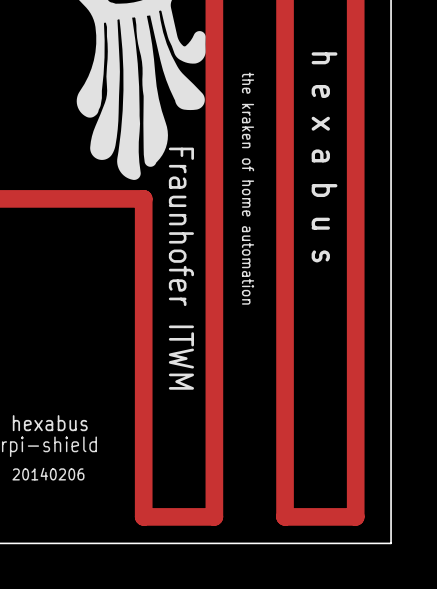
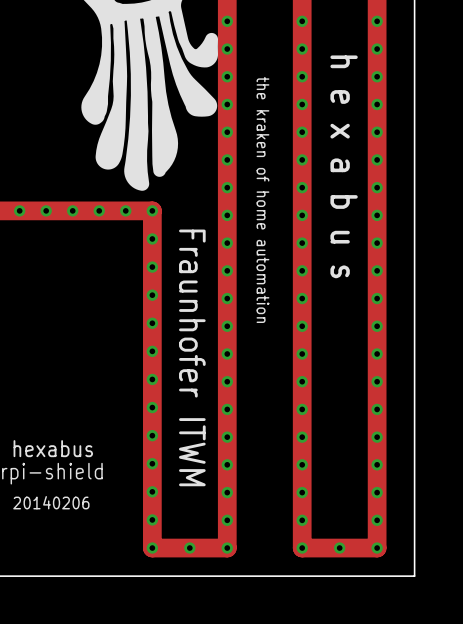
via: none -> (227, 21)
via: none -> (302, 21)
via: none -> (377, 21)
via: none -> (227, 49)
via: none -> (302, 49)
via: none -> (377, 49)
via: none -> (227, 76)
via: none -> (302, 76)
via: none -> (377, 76)
via: none -> (227, 104)
via: none -> (302, 104)
via: none -> (377, 104)
via: none -> (227, 132)
via: none -> (302, 132)
via: none -> (377, 132)
via: none -> (227, 159)
via: none -> (302, 159)
via: none -> (377, 159)
via: none -> (227, 187)
via: none -> (302, 187)
via: none -> (377, 187)
via: none -> (19, 210)
via: none -> (46, 210)
via: none -> (72, 210)
via: none -> (99, 210)
via: none -> (125, 210)
via: none -> (152, 210)
via: none -> (227, 215)
via: none -> (302, 215)
via: none -> (377, 215)
via: none -> (152, 238)
via: none -> (227, 243)
via: none -> (302, 243)
via: none -> (377, 243)
via: none -> (152, 267)
via: none -> (227, 270)
via: none -> (302, 270)
via: none -> (377, 270)
text position: Fraunhofer ITWM (181, 268) -> Fraunhofer ITWM (192, 357)
via: none -> (152, 295)
via: none -> (227, 298)
via: none -> (302, 298)
via: none -> (377, 298)
via: none -> (152, 323)
via: none -> (227, 326)
via: none -> (302, 326)
via: none -> (377, 326)
via: none -> (152, 351)
via: none -> (227, 353)
via: none -> (302, 353)
via: none -> (377, 353)
via: none -> (152, 379)
via: none -> (227, 381)
via: none -> (302, 381)
via: none -> (377, 381)
via: none -> (152, 407)
via: none -> (227, 409)
via: none -> (302, 409)
via: none -> (377, 409)
via: none -> (152, 435)
via: none -> (227, 437)
via: none -> (302, 437)
via: none -> (377, 437)
via: none -> (152, 463)
via: none -> (227, 464)
via: none -> (302, 464)
via: none -> (377, 464)
via: none -> (152, 491)
via: none -> (227, 492)
via: none -> (302, 492)
via: none -> (377, 492)
via: none -> (152, 519)
via: none -> (227, 520)
via: none -> (302, 520)
via: none -> (377, 520)
via: none -> (152, 548)
via: none -> (189, 548)
via: none -> (227, 548)
via: none -> (302, 548)
via: none -> (339, 548)
via: none -> (377, 548)

